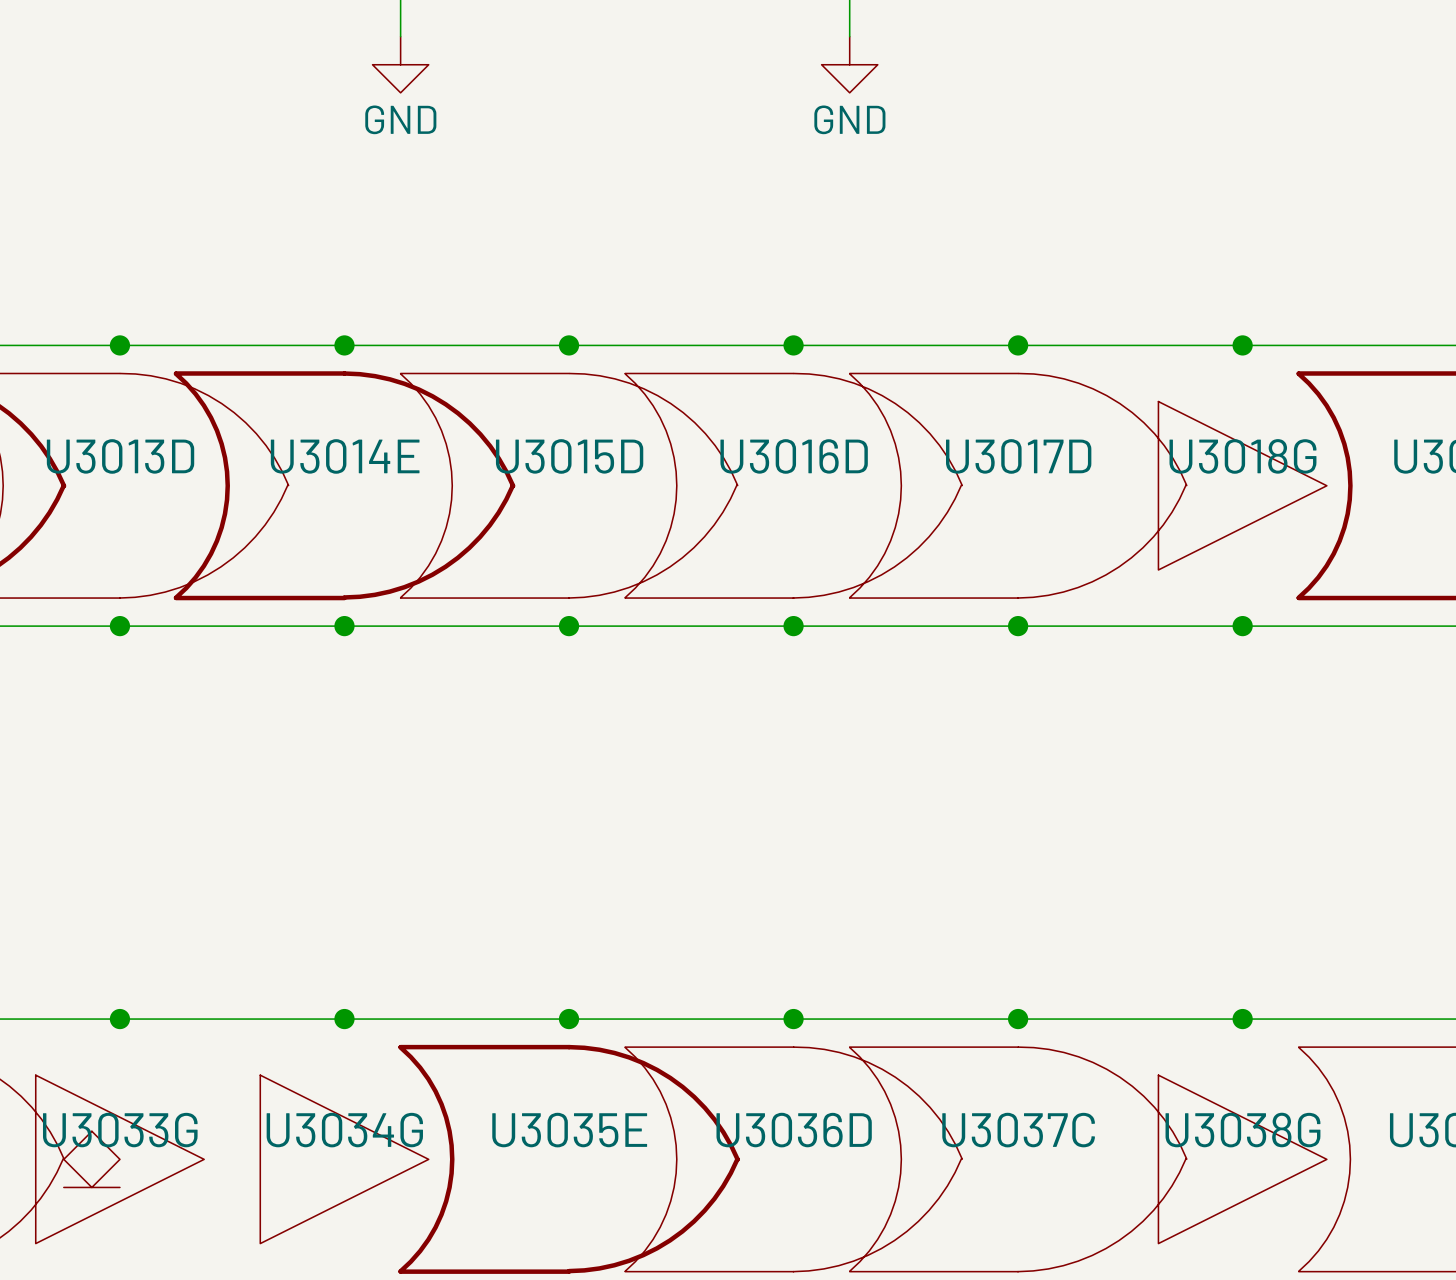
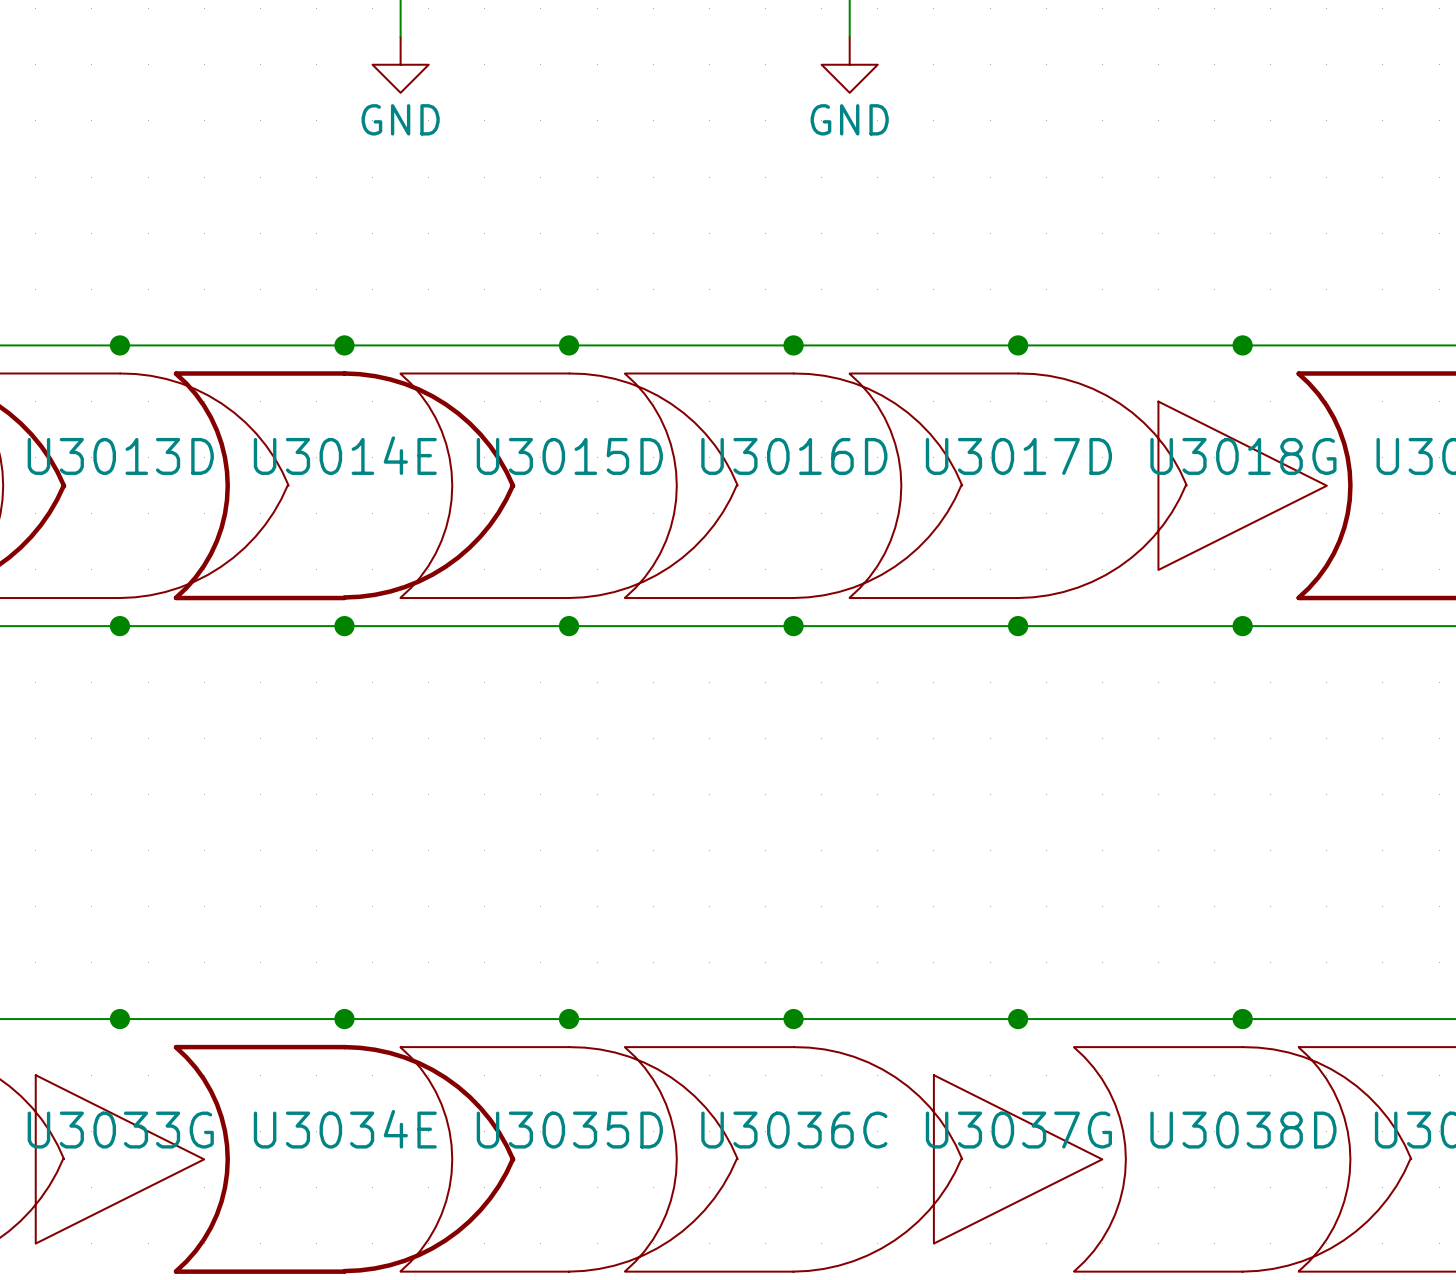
U3033G symbol: [35, 1075, 205, 1244] -> [35, 1075, 205, 1244]
U3036D name: U3036D (794, 1130) -> U3036C (794, 1130)
U3034G: (344, 1159) -> none
U3034E: none -> (344, 1159)
U3035E: (569, 1159) -> none
U3035D: none -> (569, 1159)
U3037C: (1018, 1159) -> none
U3037G: none -> (1018, 1159)
U3038G: (1242, 1159) -> none
U3038D: none -> (1242, 1159)

